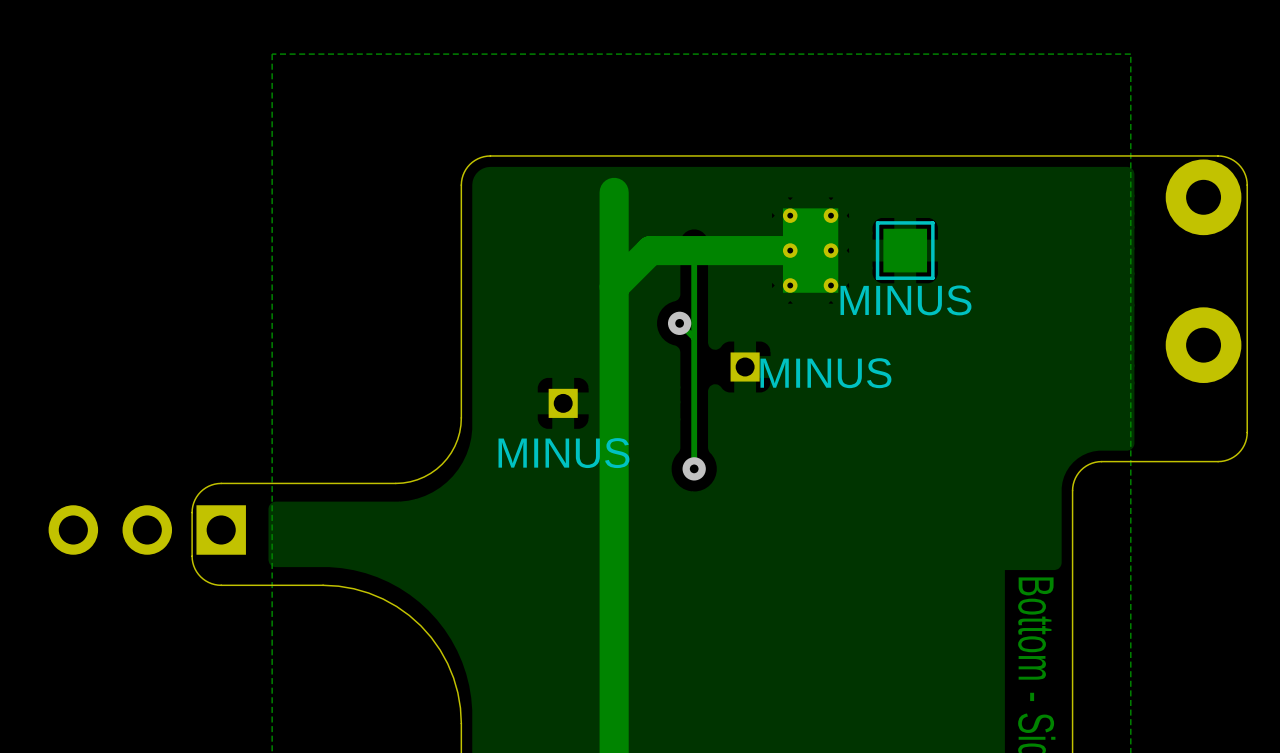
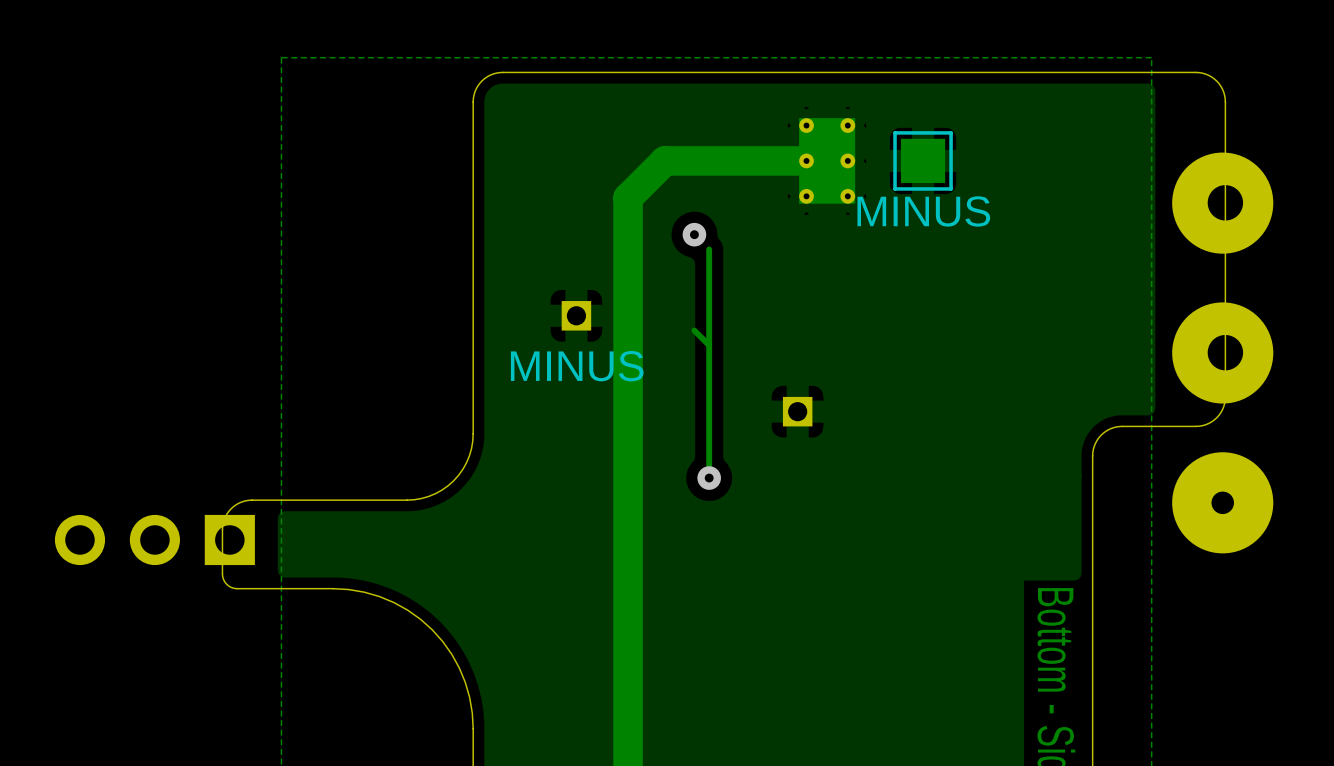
board edge: (461, 185) (462, 175) (469, 164) (477, 158) (490, 155) (1218, 155) (1230, 158) (1242, 169) (1247, 185) (1247, 432) (1244, 445) (1236, 455) (1221, 461) (1095, 462) (1086, 466) (1078, 472) (1074, 481) (1072, 490) -> (473, 190) (473, 95) (481, 81) (489, 75) (499, 72) (1195, 72) (1208, 75) (1220, 86) (1225, 101) (1224, 403) (1216, 417) (1202, 425) (1118, 426) (1103, 432) (1095, 443) (1092, 452) (1092, 500)
track: (790, 250) (650, 250) (614, 286) -> (806, 160) (664, 160) (628, 197)
part position: (810, 250) -> (827, 160)
part position: (905, 250) -> (923, 160)
via position: (679, 323) -> (694, 234)
part: none -> (1222, 352)
part: MINUS (745, 367) -> none
part position: (563, 403) -> (576, 315)
part: none -> (797, 411)
board edge: (461, 417) (457, 439) (447, 458) (430, 473) (410, 481) (395, 483) (221, 483) (208, 486) (198, 494) (192, 506) (192, 556) (193, 565) (198, 574) (205, 580) (214, 584) (338, 586) (368, 593) (396, 606) (420, 625) (440, 650) (447, 663) (457, 692) (461, 723) -> (473, 426) (471, 448) (463, 469) (448, 485) (428, 496) (406, 500) (248, 500) (239, 503) (228, 511) (224, 519) (222, 529) (222, 575) (225, 583) (230, 587) (348, 589) (379, 596) (407, 610) (420, 619) (442, 641) (459, 667) (469, 697) (473, 736)

